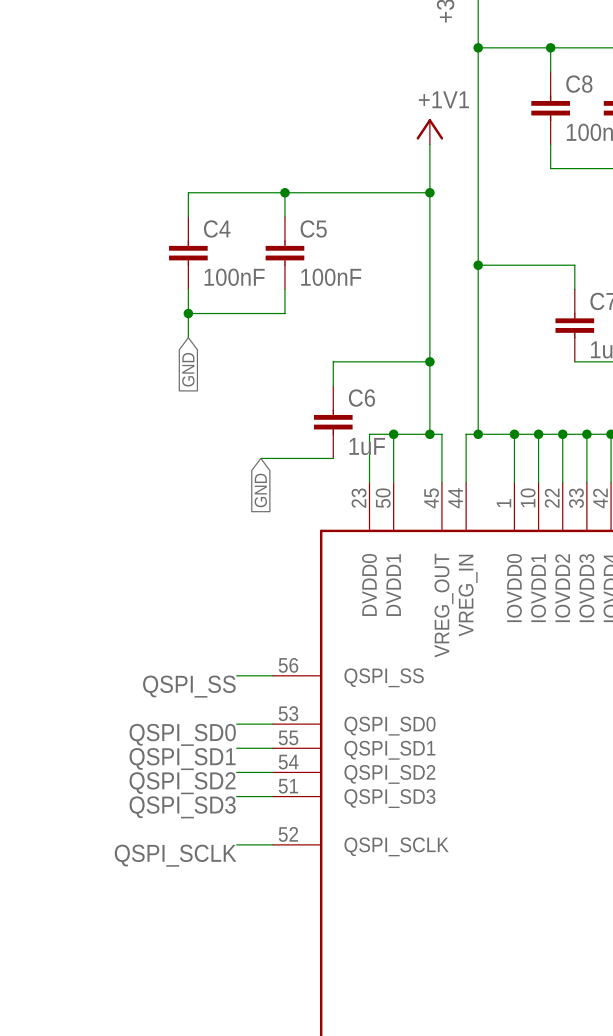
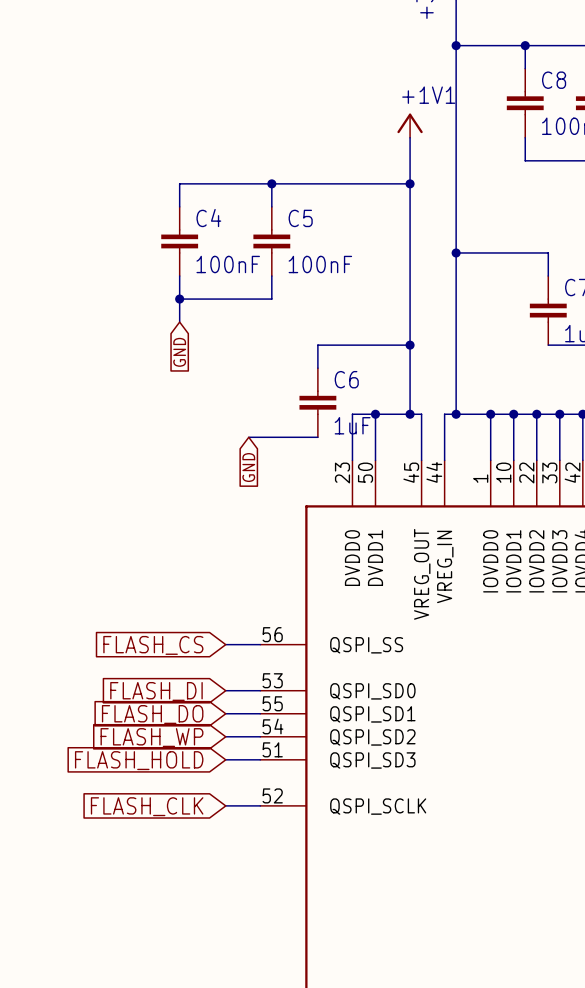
global label: none -> FLASH_CS (153, 645)
label: QSPI_SS (189, 686) -> none
global label: none -> FLASH_DI (156, 691)
label: QSPI_SD0 (182, 734) -> none
global label: none -> FLASH_DO (152, 714)
label: QSPI_SD1 (182, 759) -> none
global label: none -> FLASH_WP (151, 737)
label: QSPI_SD2 (182, 783) -> none
global label: none -> FLASH_HOLD (139, 760)
label: QSPI_SD3 (182, 807) -> none
global label: none -> FLASH_CLK (147, 806)
label: QSPI_SCLK (175, 855) -> none

